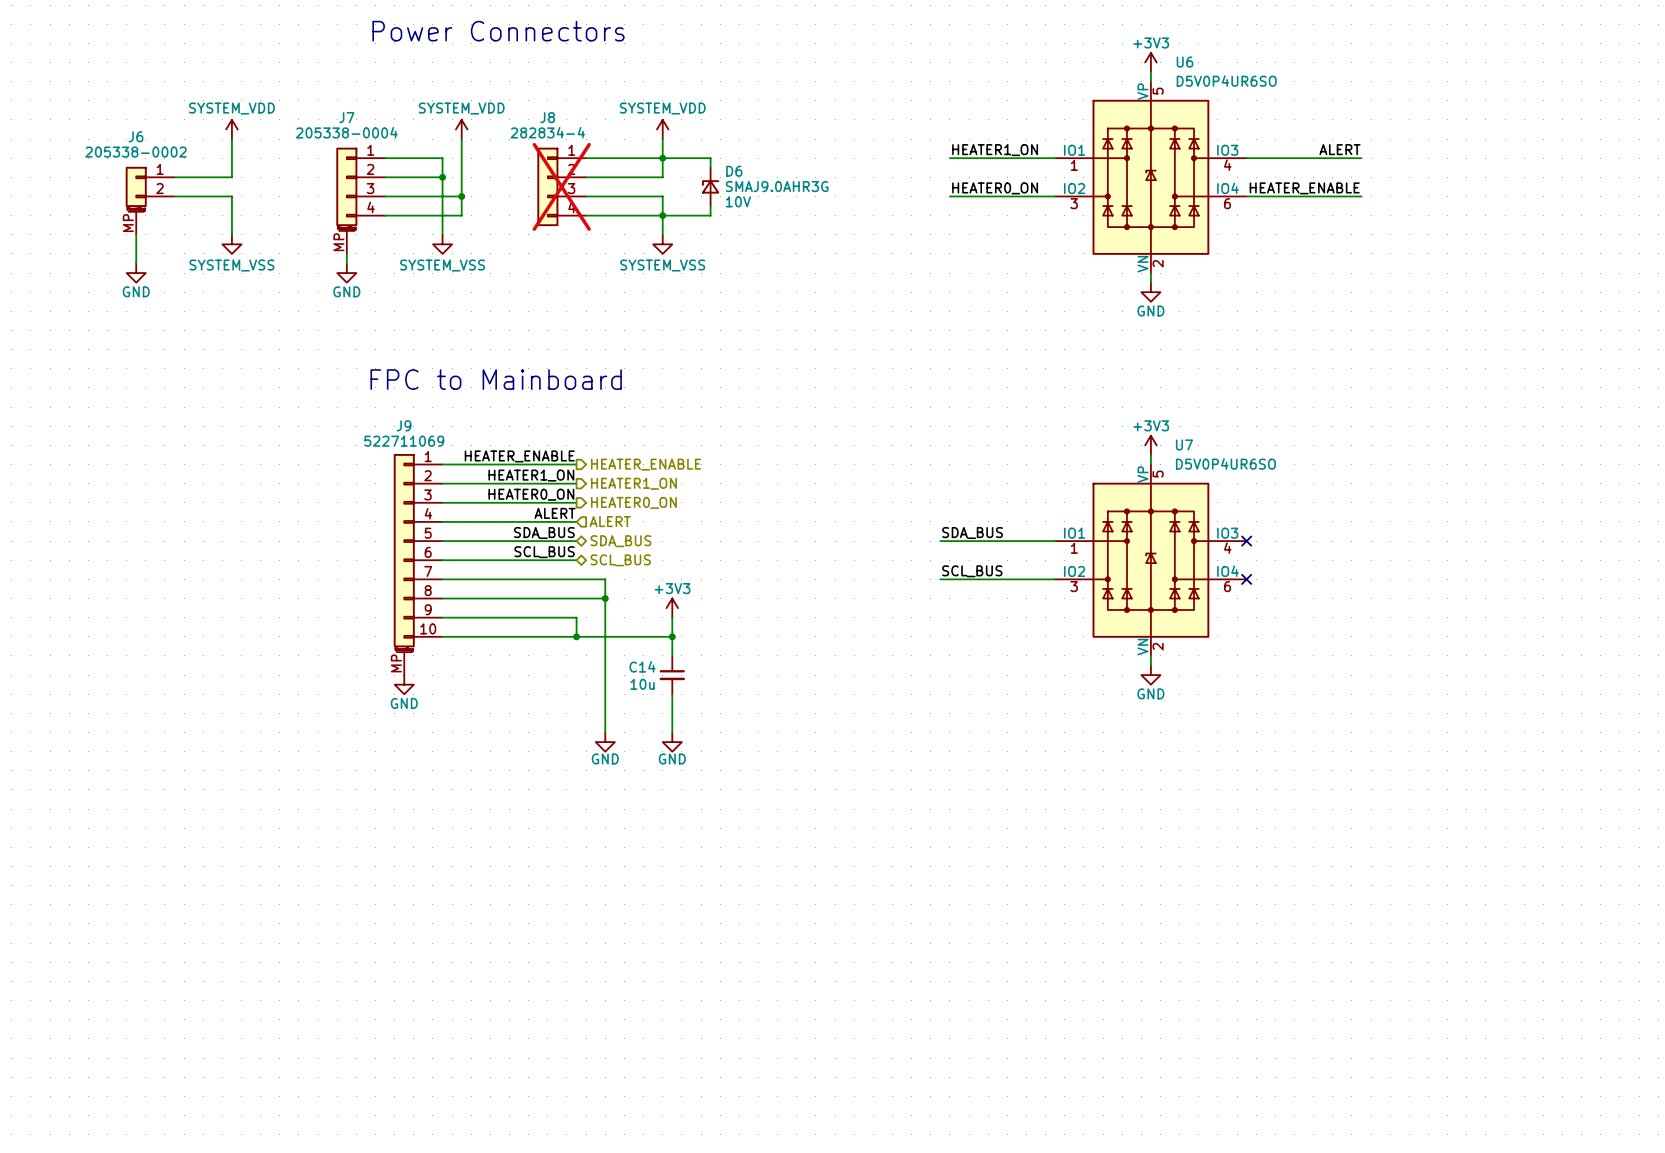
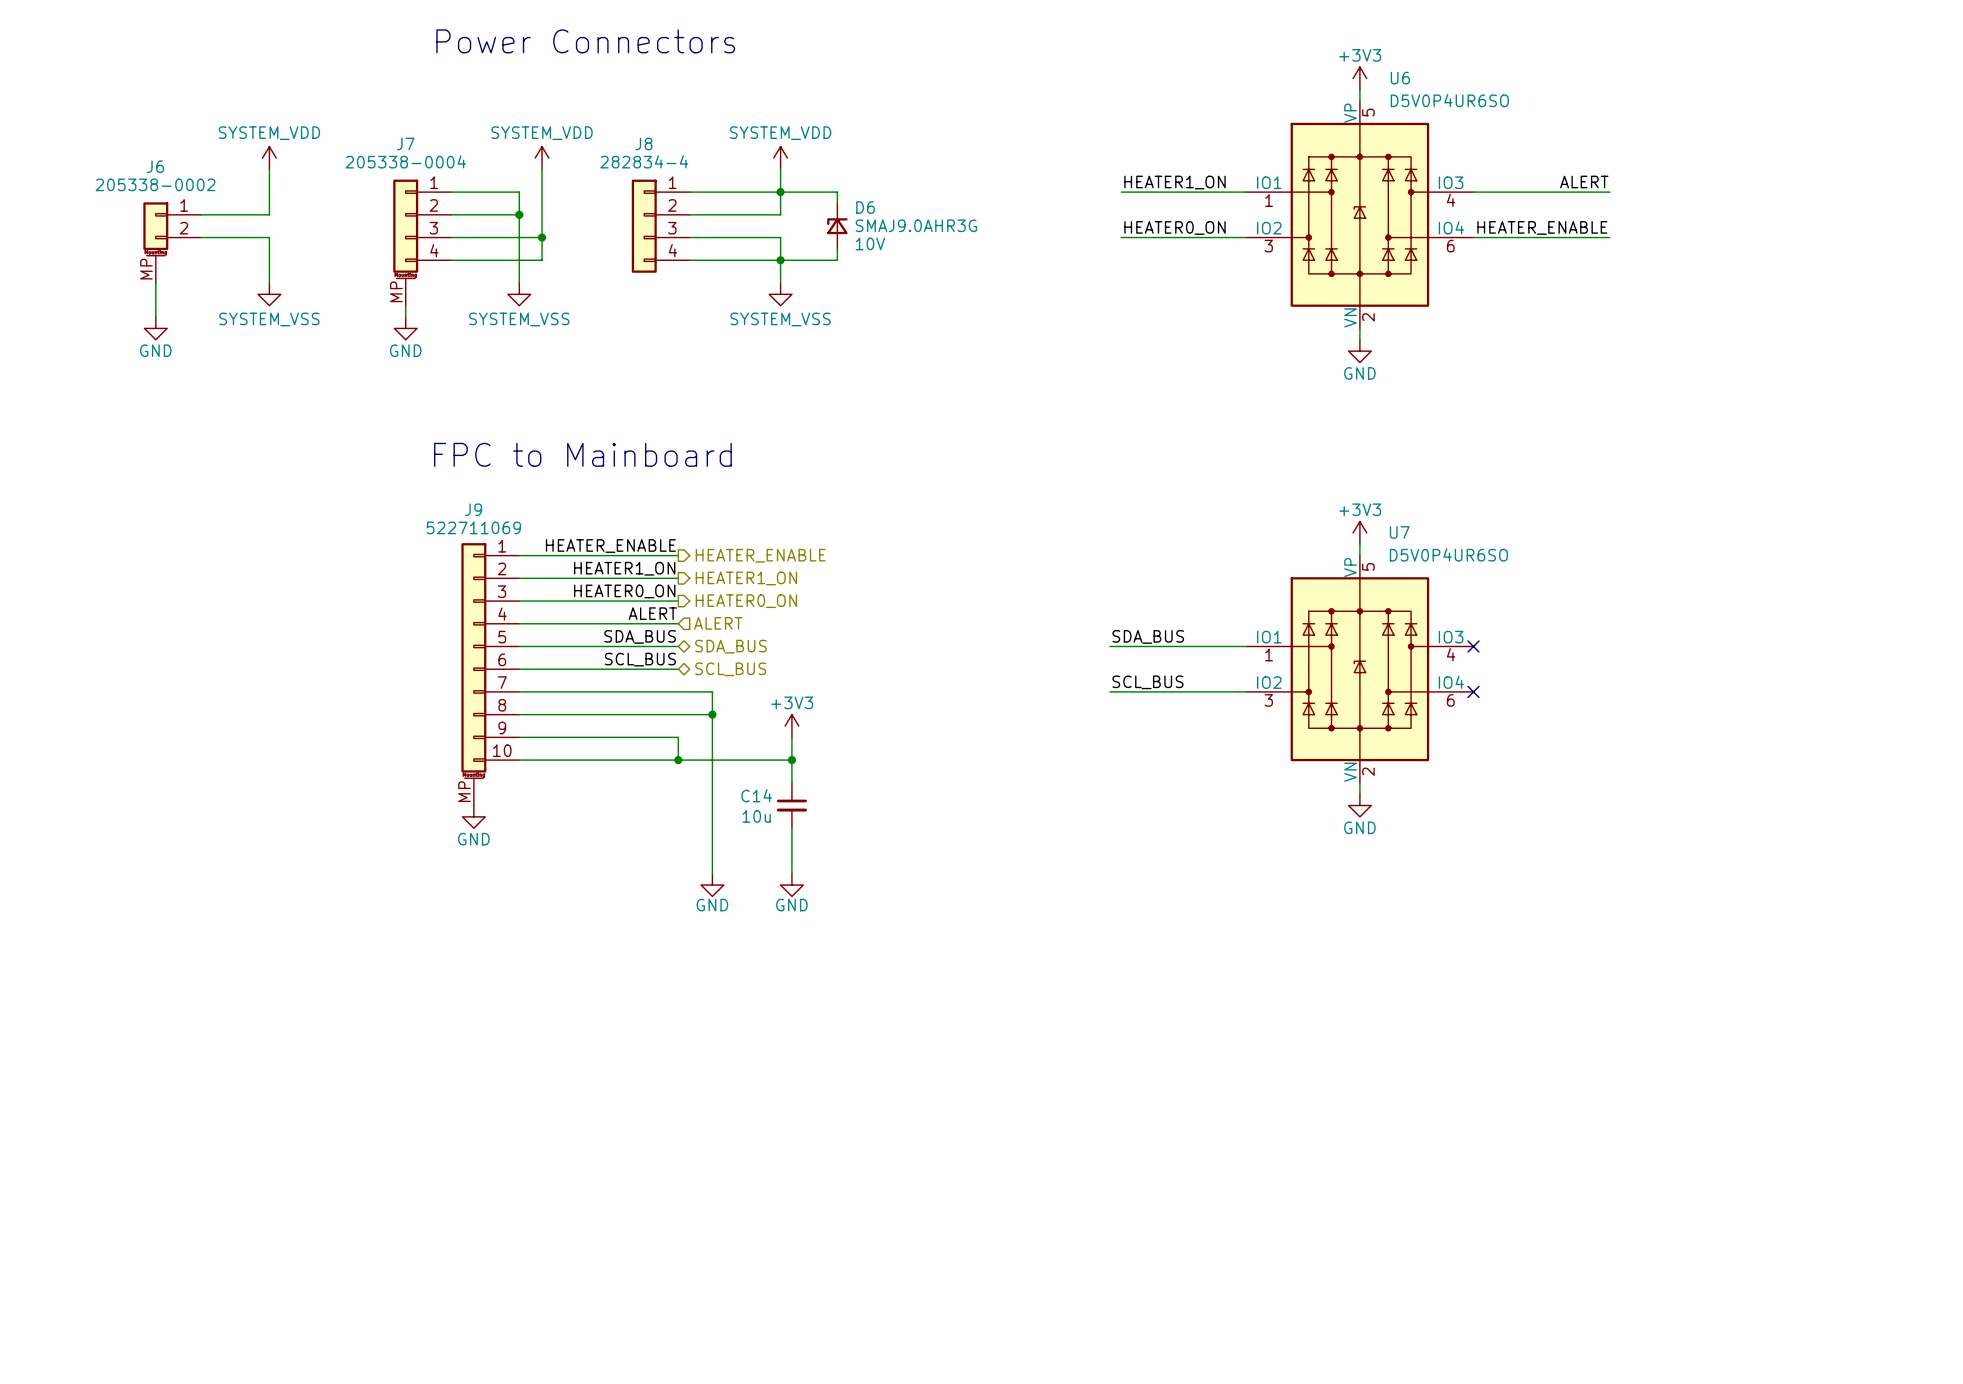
J8 do-not-place cross: (561, 186) -> none

